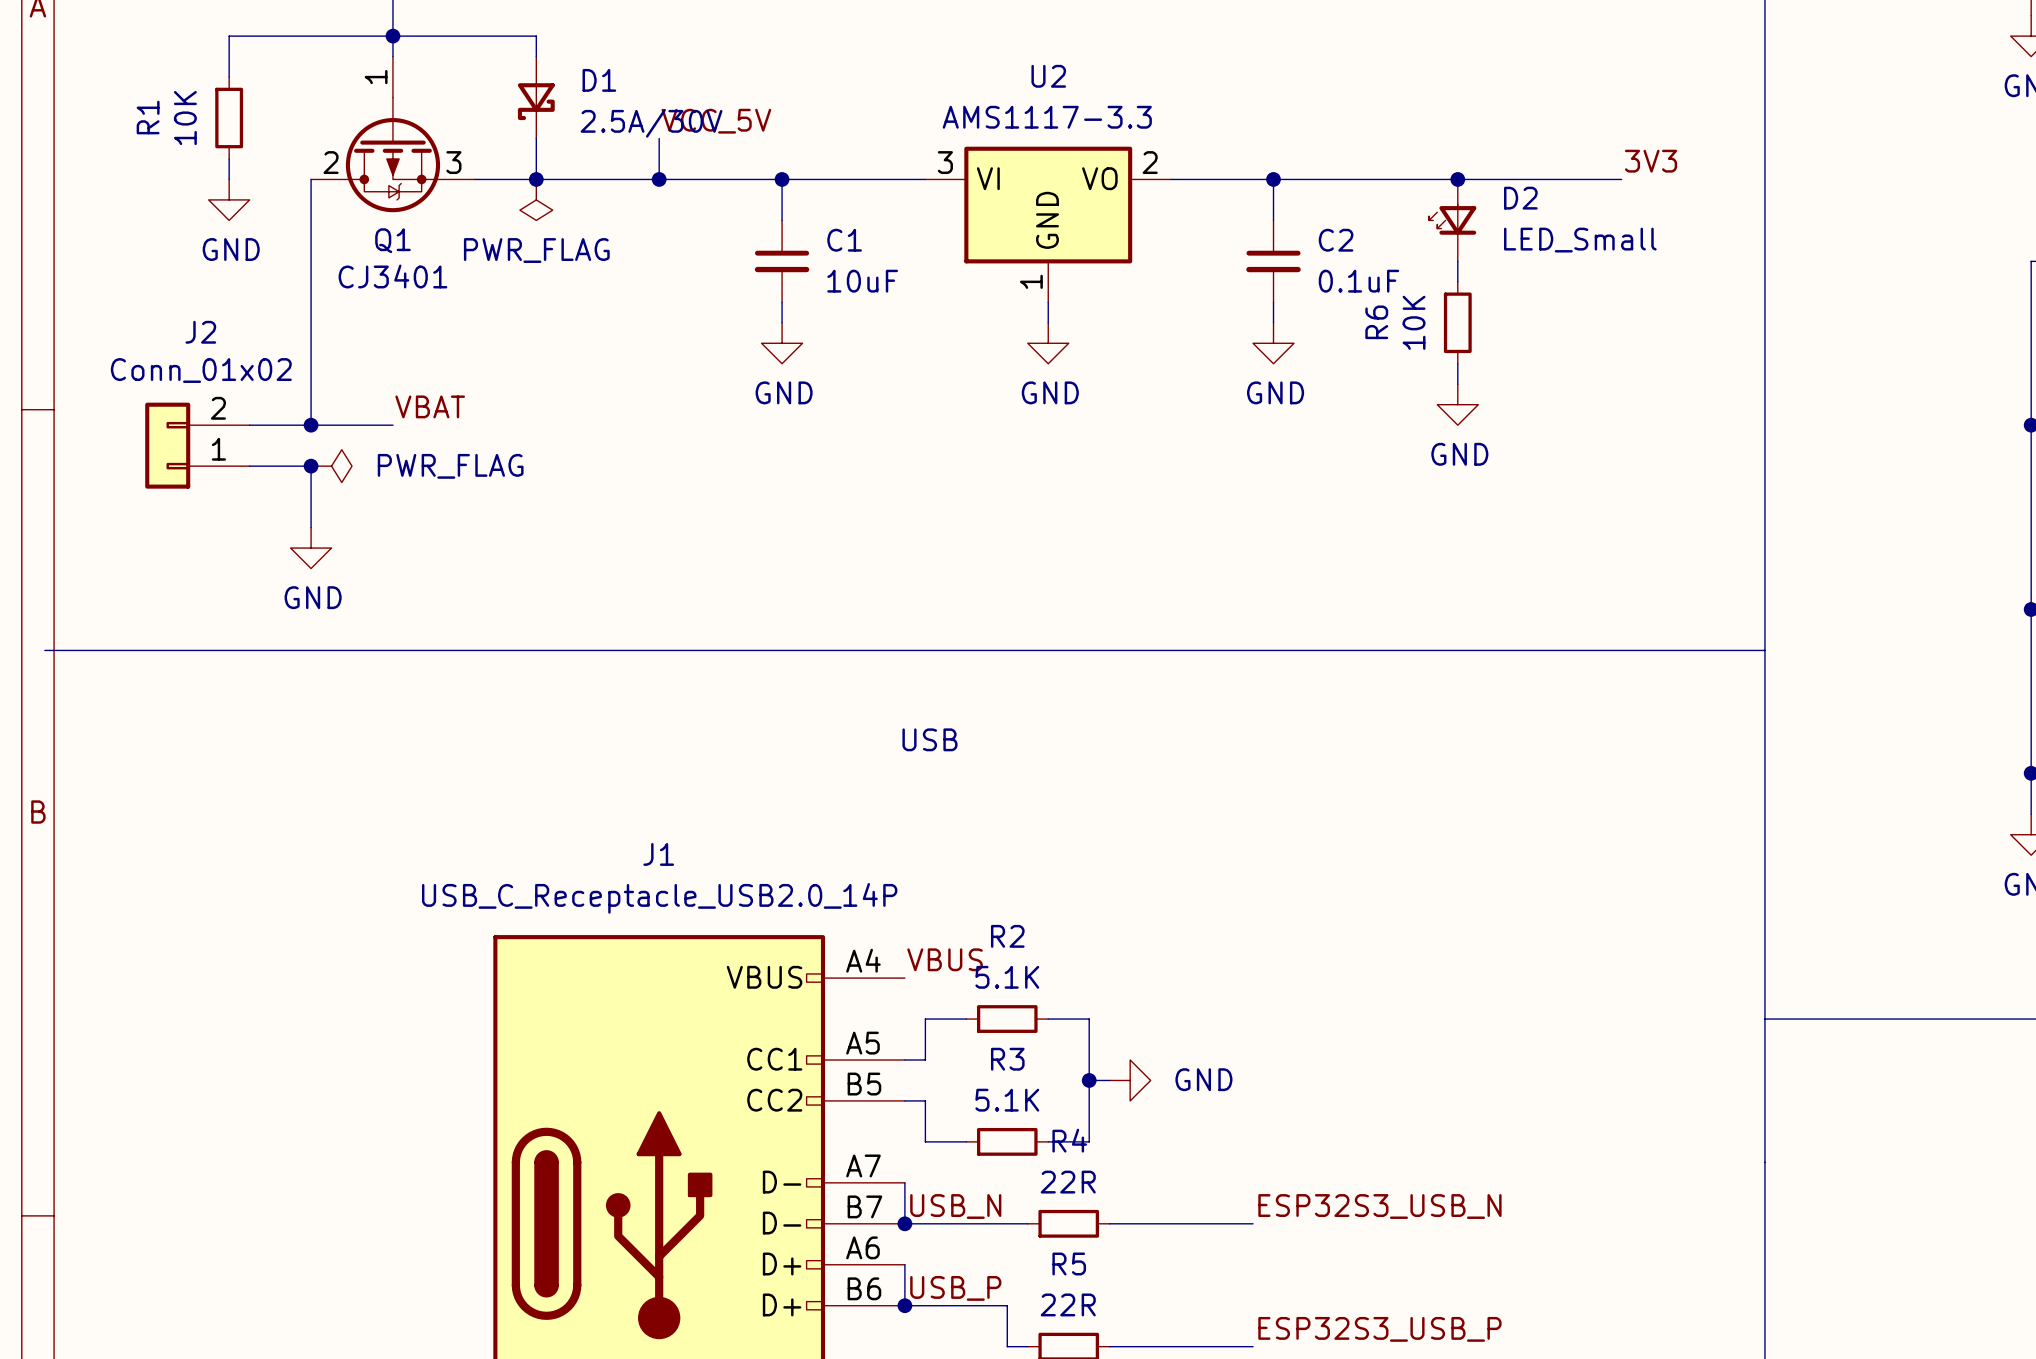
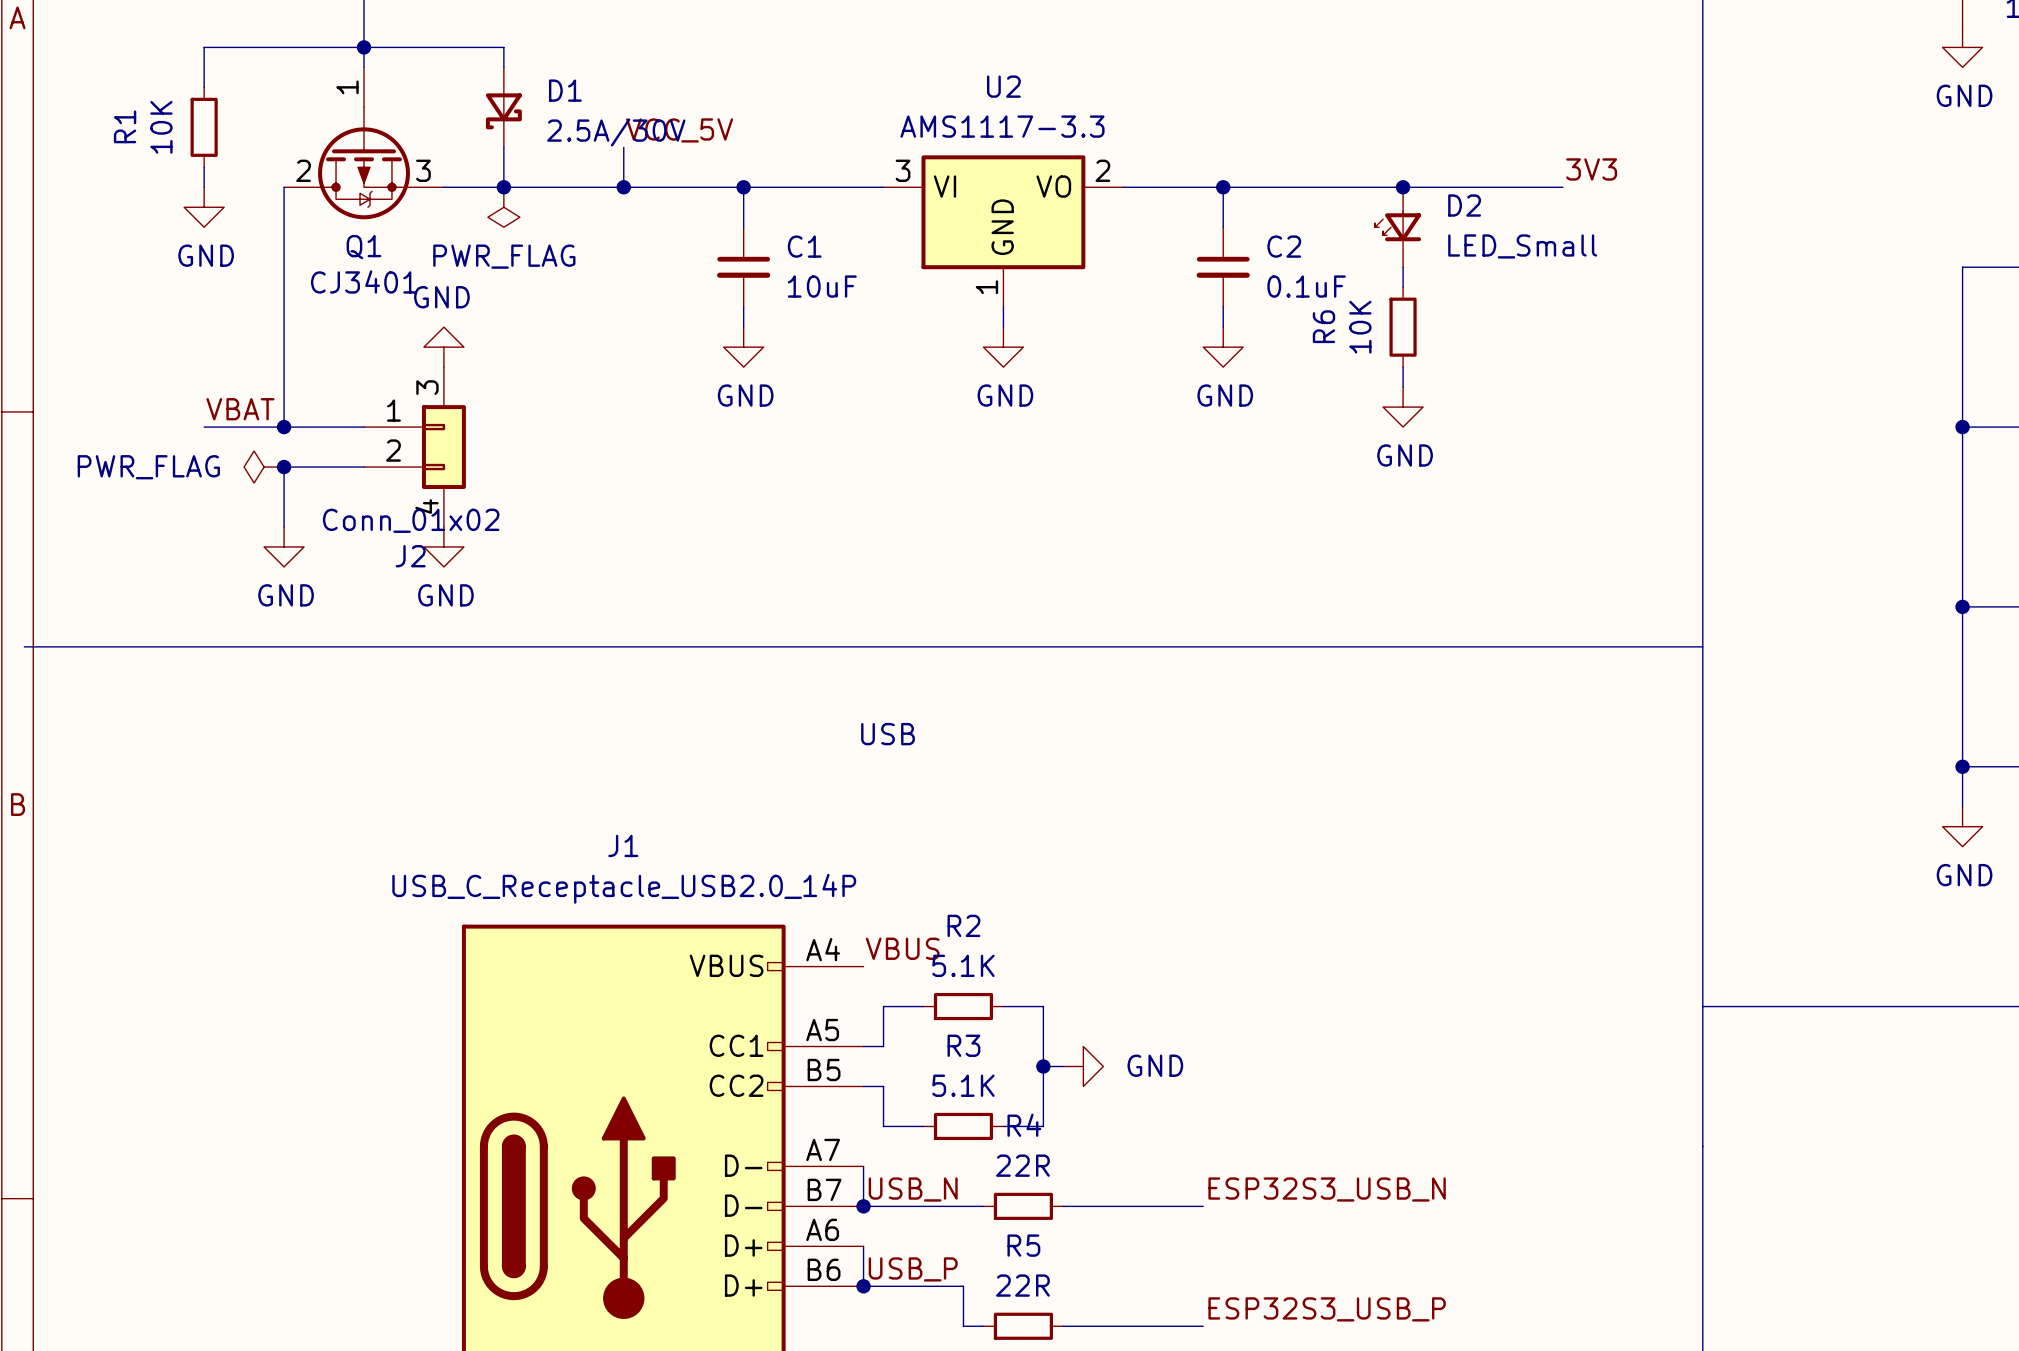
J2 name position: J2 (200, 332) -> J2 (410, 556)
power symbol: none -> GND (443, 347)
J2 value position: Conn_01x02 (201, 370) -> Conn_01x02 (411, 520)
J2 symbol: [145, 402, 250, 489] -> [364, 367, 466, 527]
label position: VBAT (430, 406) -> VBAT (240, 409)
wire: (249, 466) (311, 466) -> (364, 467) (284, 467)
power symbol rotation: 0° (331, 466) -> 180° (264, 467)
power symbol position: PWR_FLAG (331, 466) -> PWR_FLAG (264, 467)
power symbol: none -> GND (443, 546)

